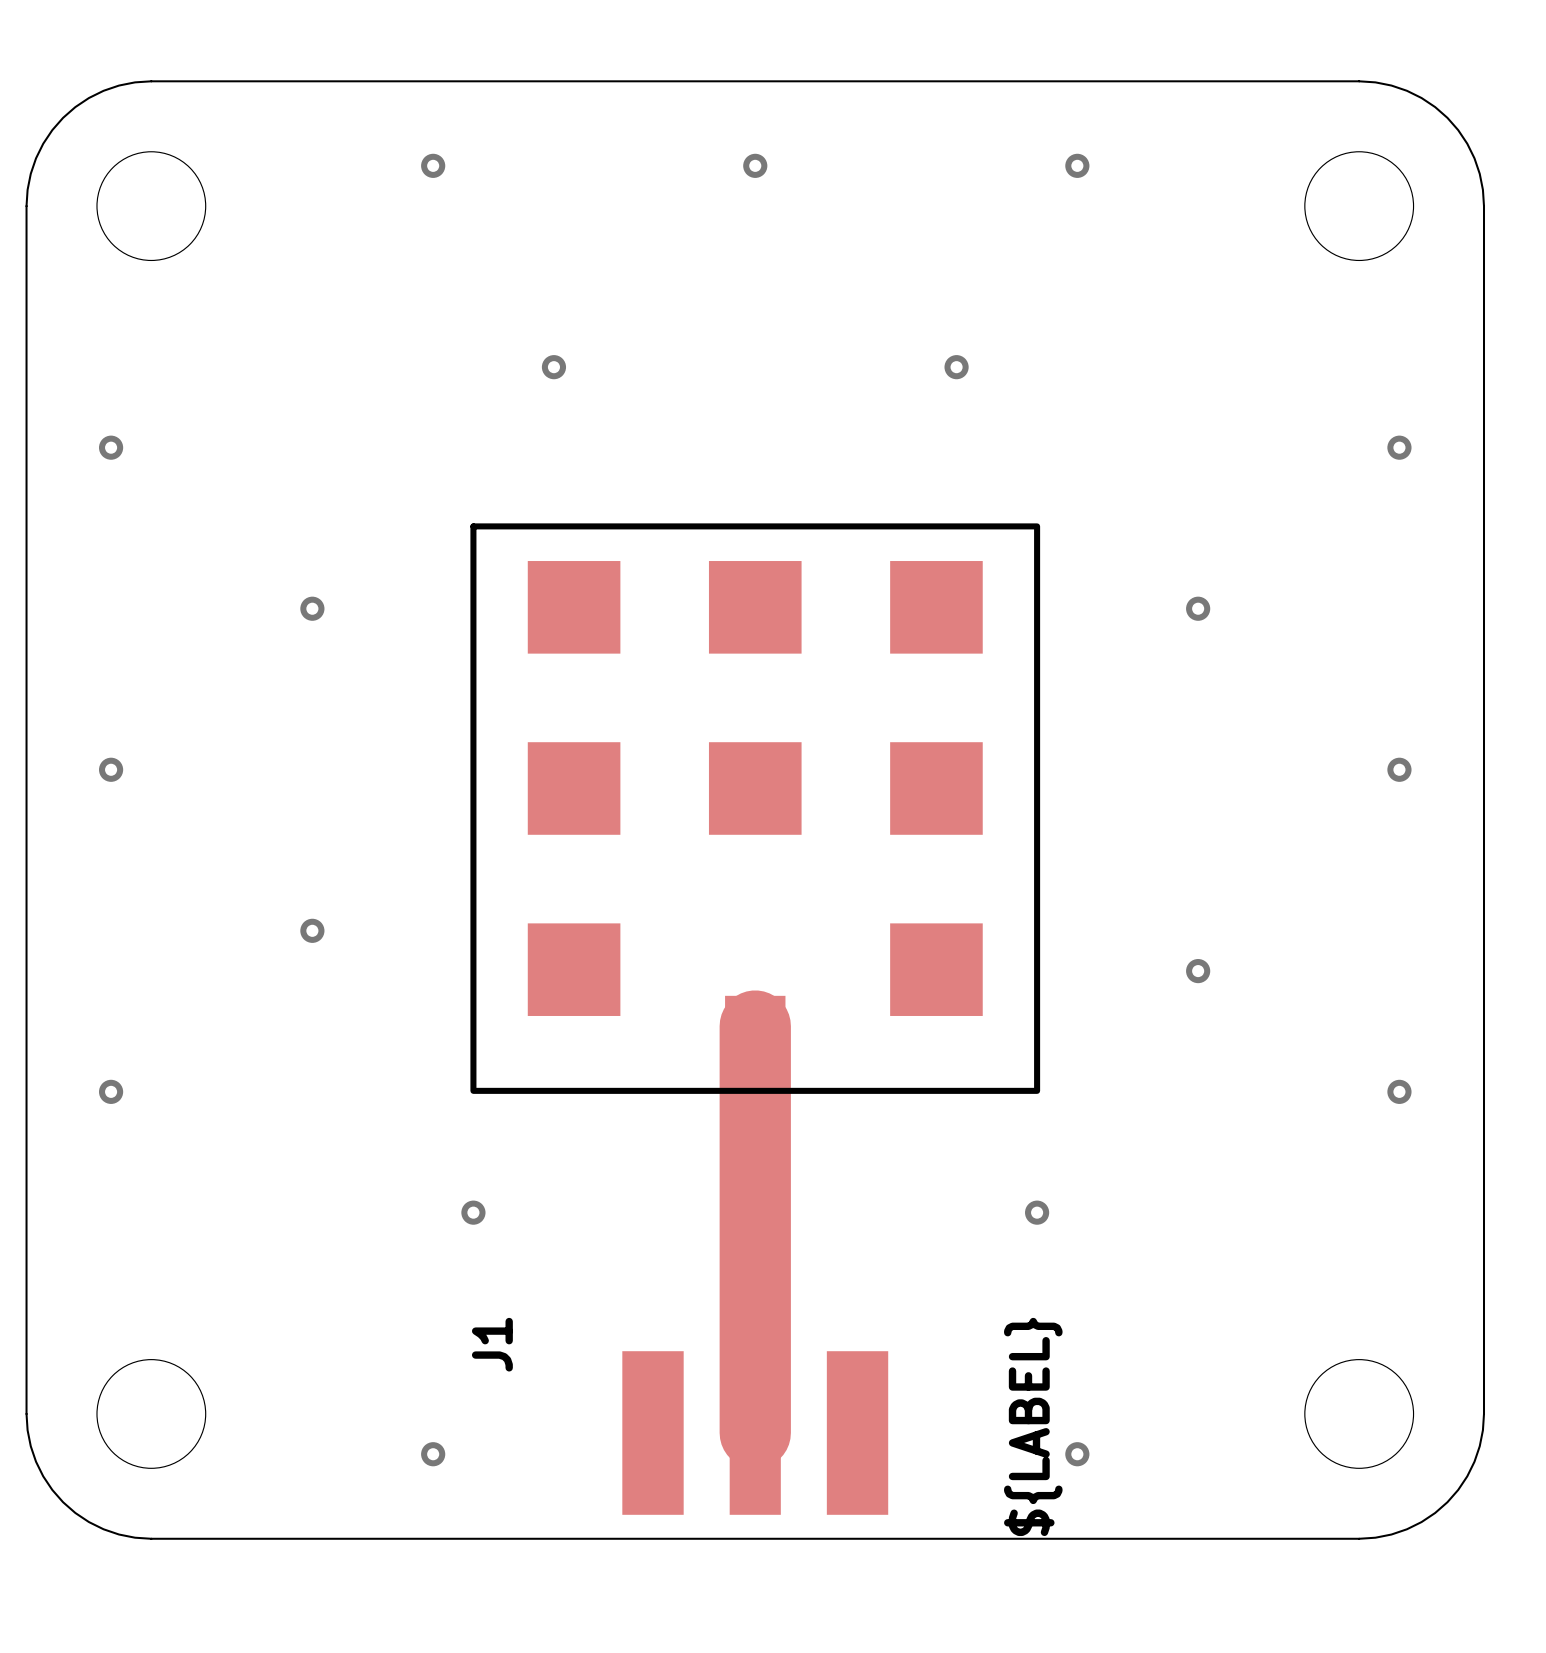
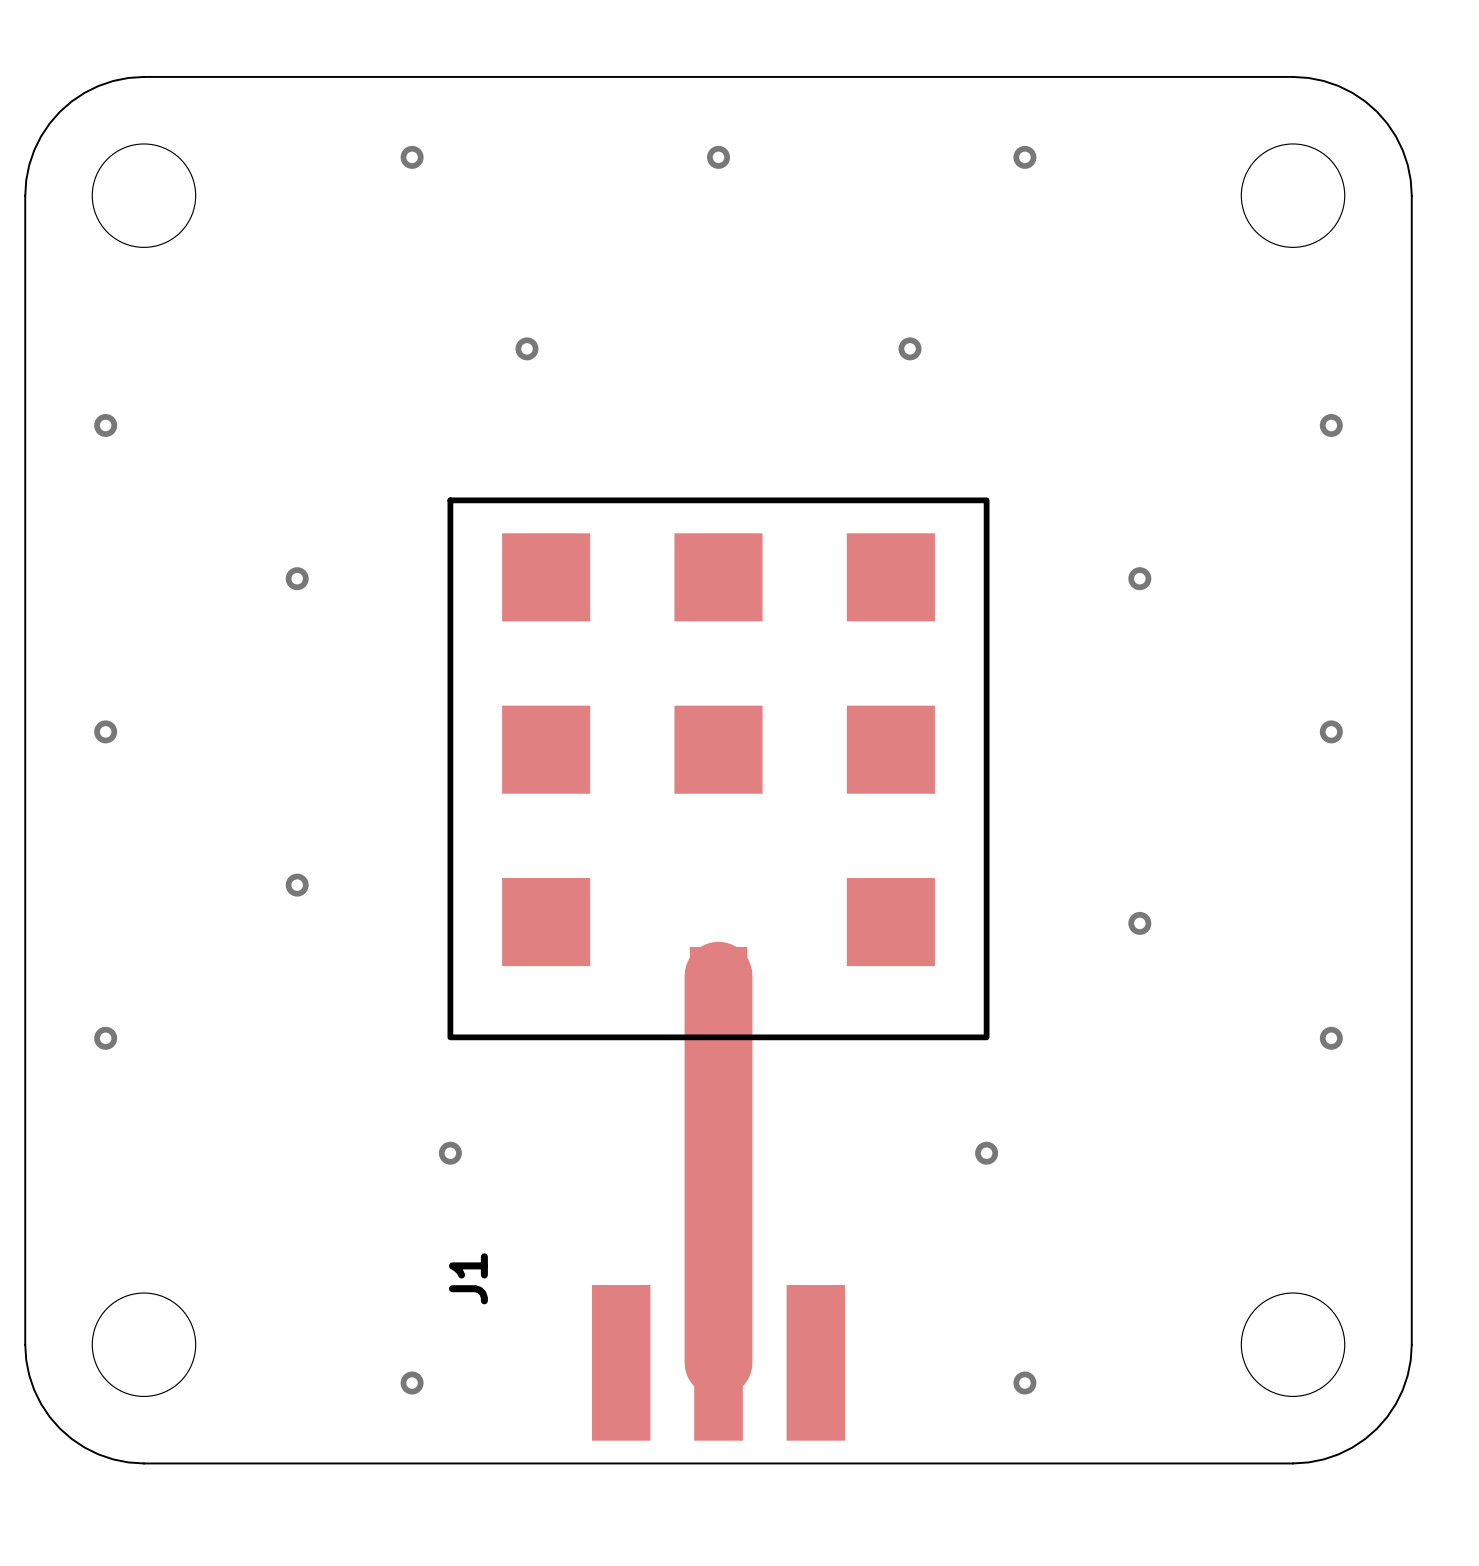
J1 text: ${LABEL} (1033, 1426) -> none

